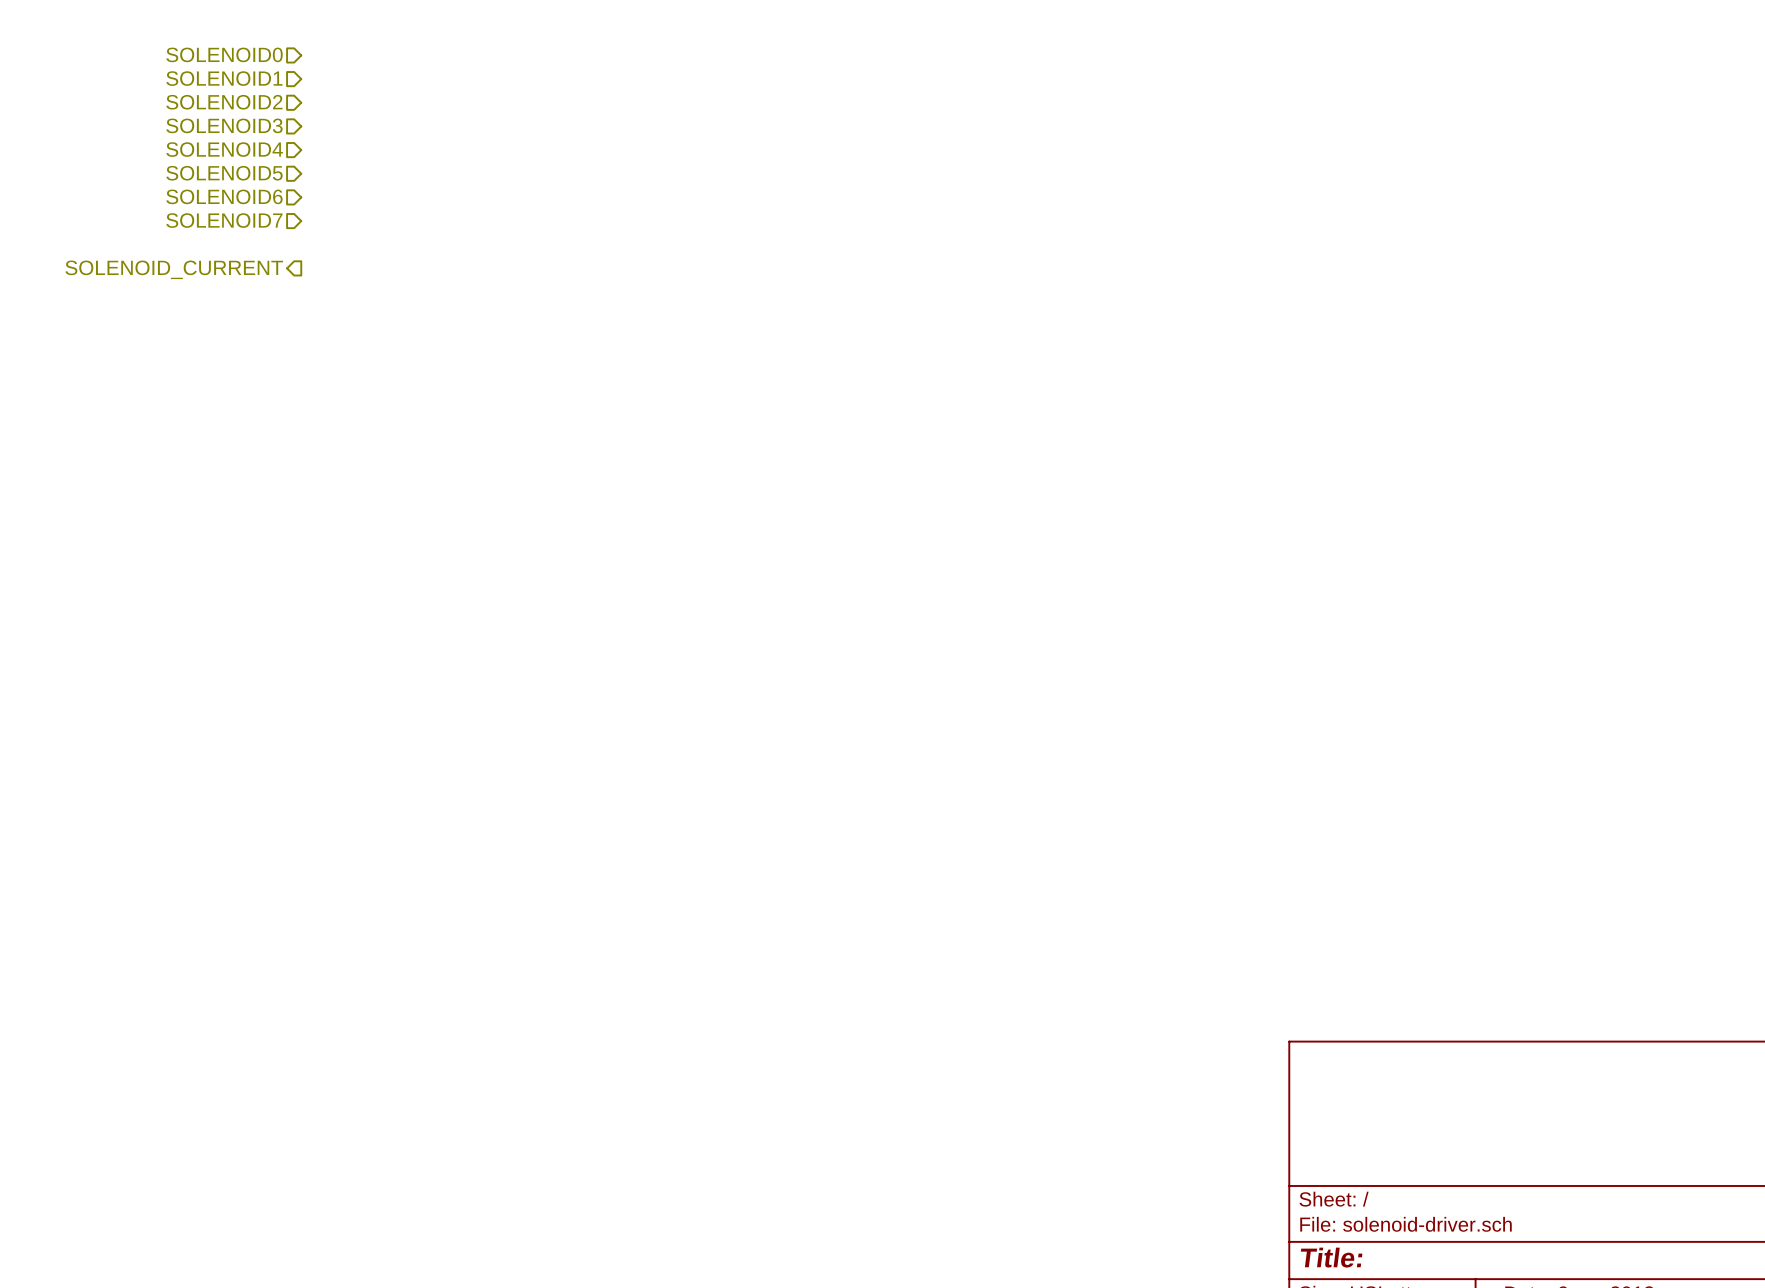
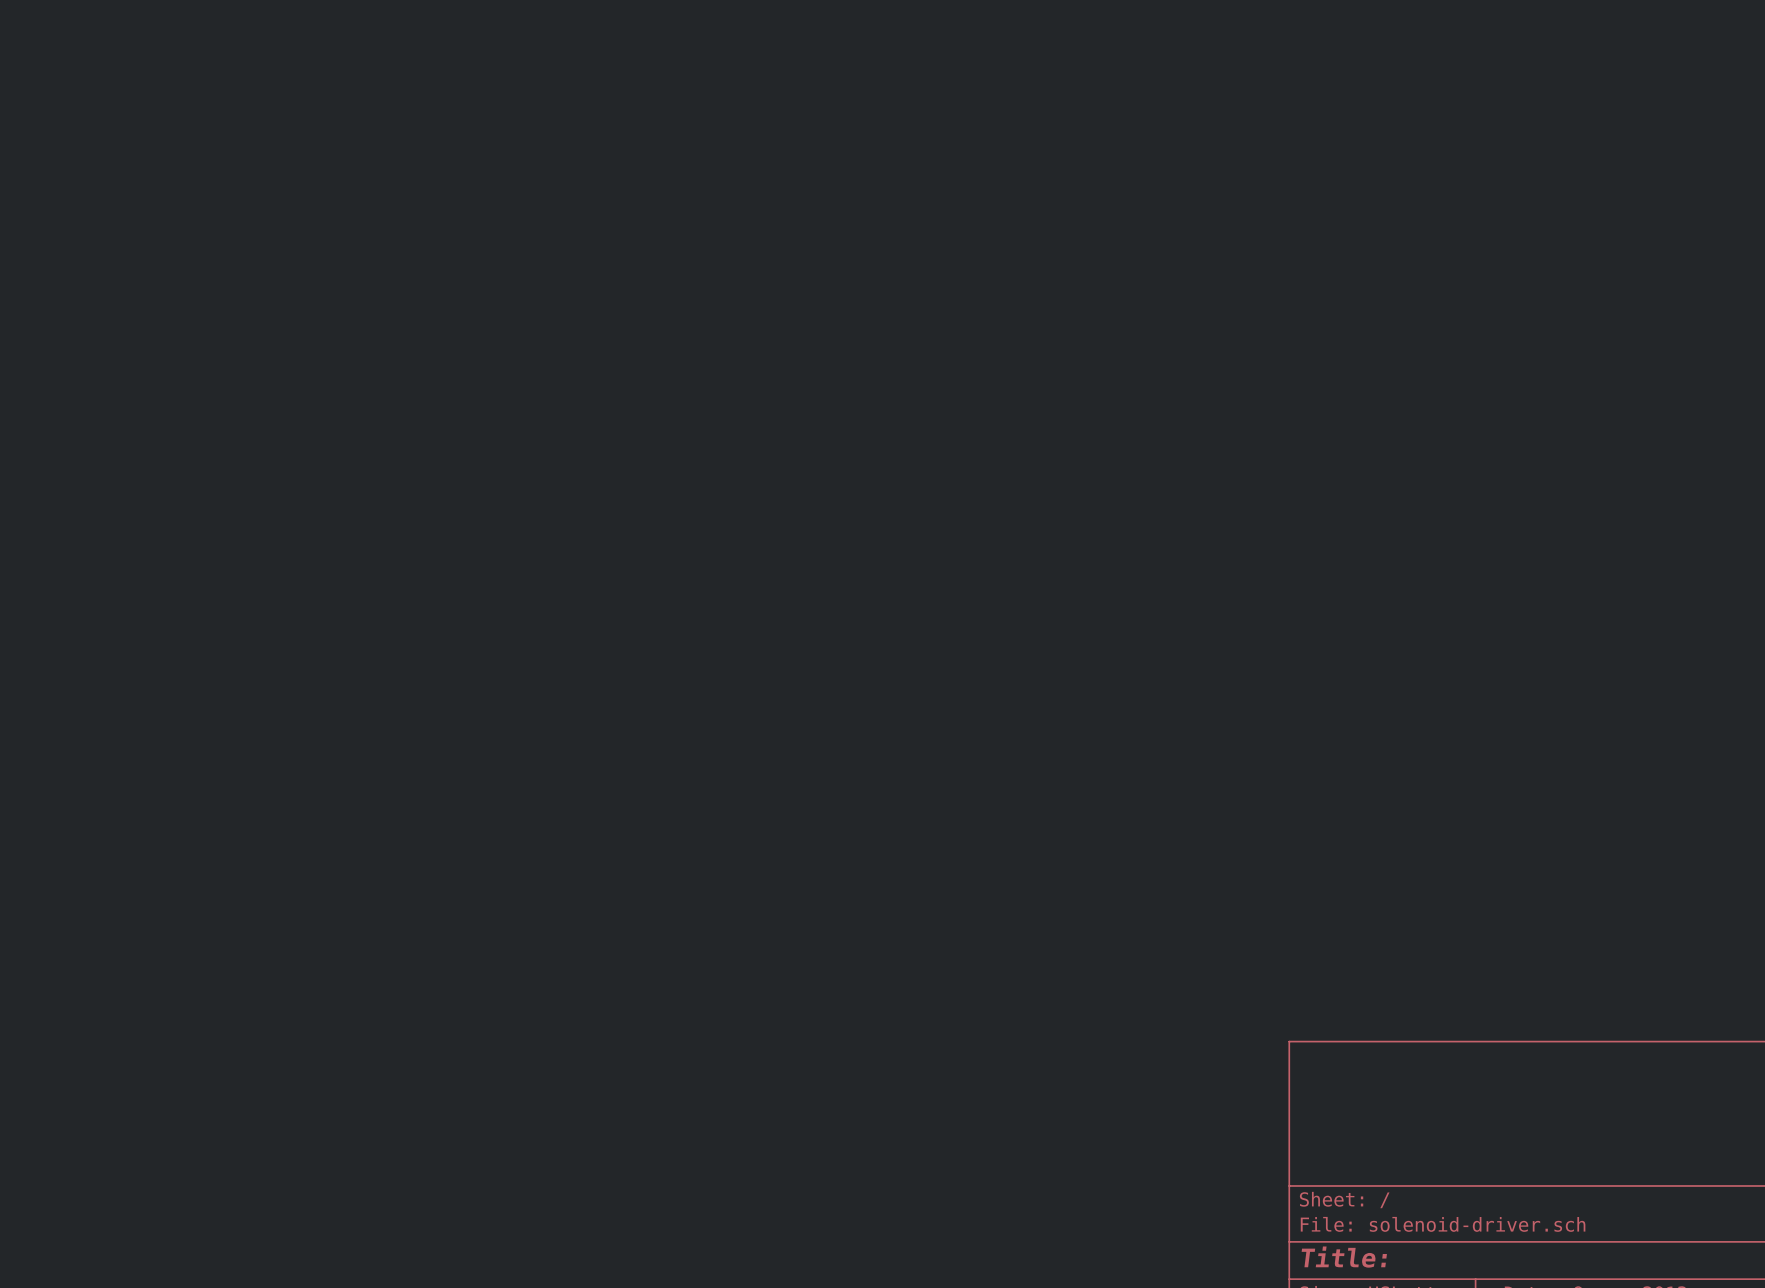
hierarchical label: SOLENOID0 (224, 54) -> none
hierarchical label: SOLENOID1 (224, 78) -> none
hierarchical label: SOLENOID2 (224, 102) -> none
hierarchical label: SOLENOID3 (224, 125) -> none
hierarchical label: SOLENOID4 (224, 149) -> none
hierarchical label: SOLENOID5 (224, 173) -> none
hierarchical label: SOLENOID6 (224, 196) -> none
hierarchical label: SOLENOID7 (224, 220) -> none
hierarchical label: SOLENOID_CURRENT (174, 269) -> none

